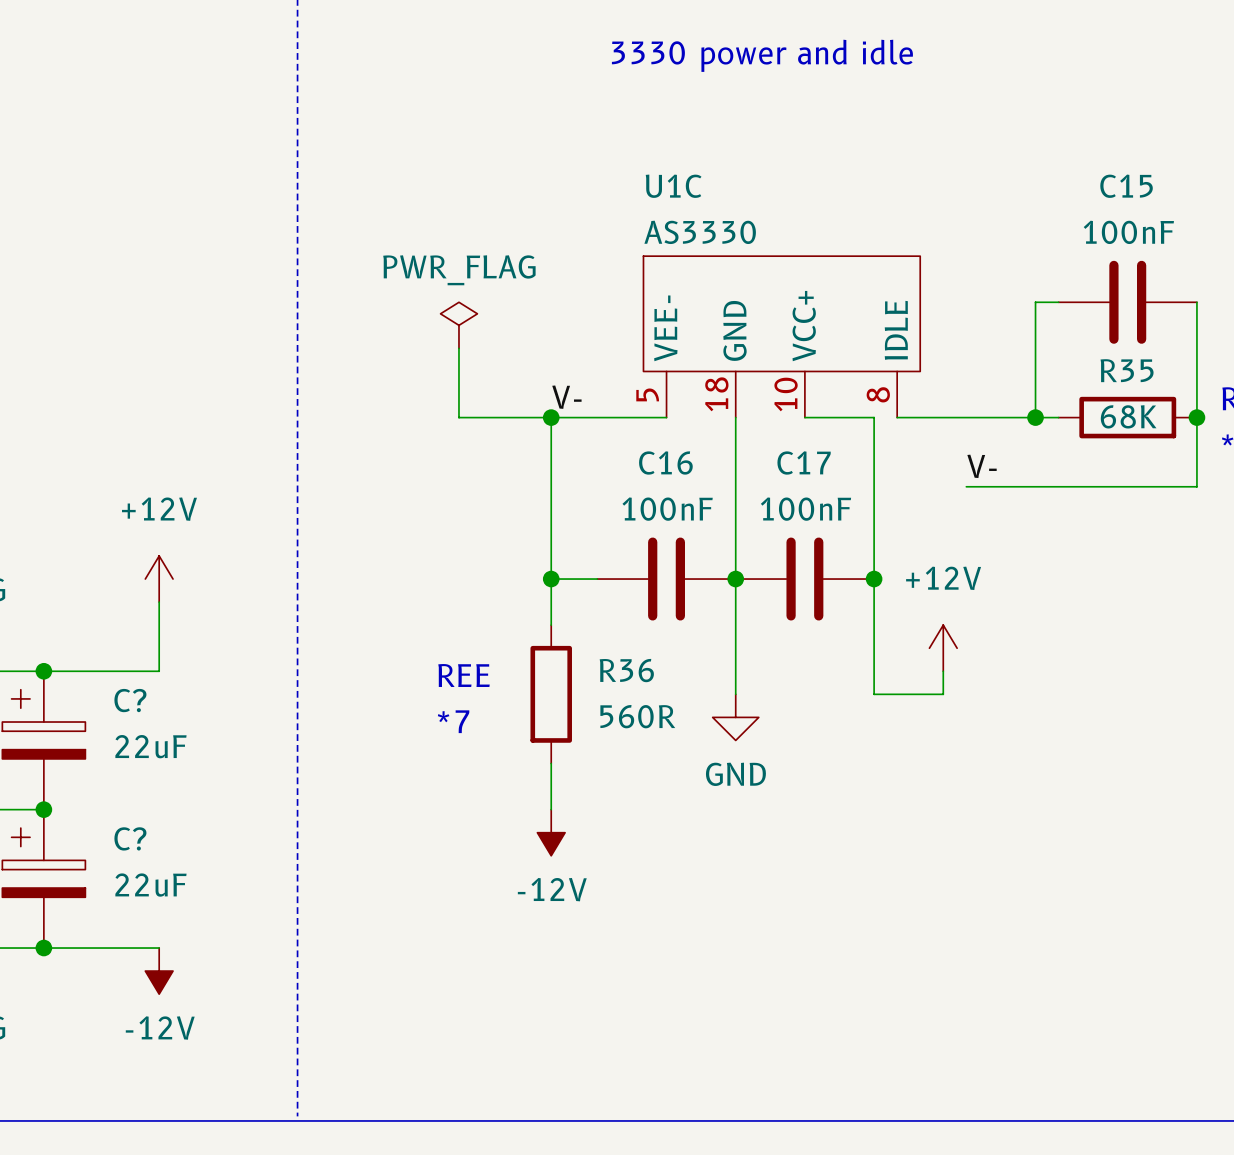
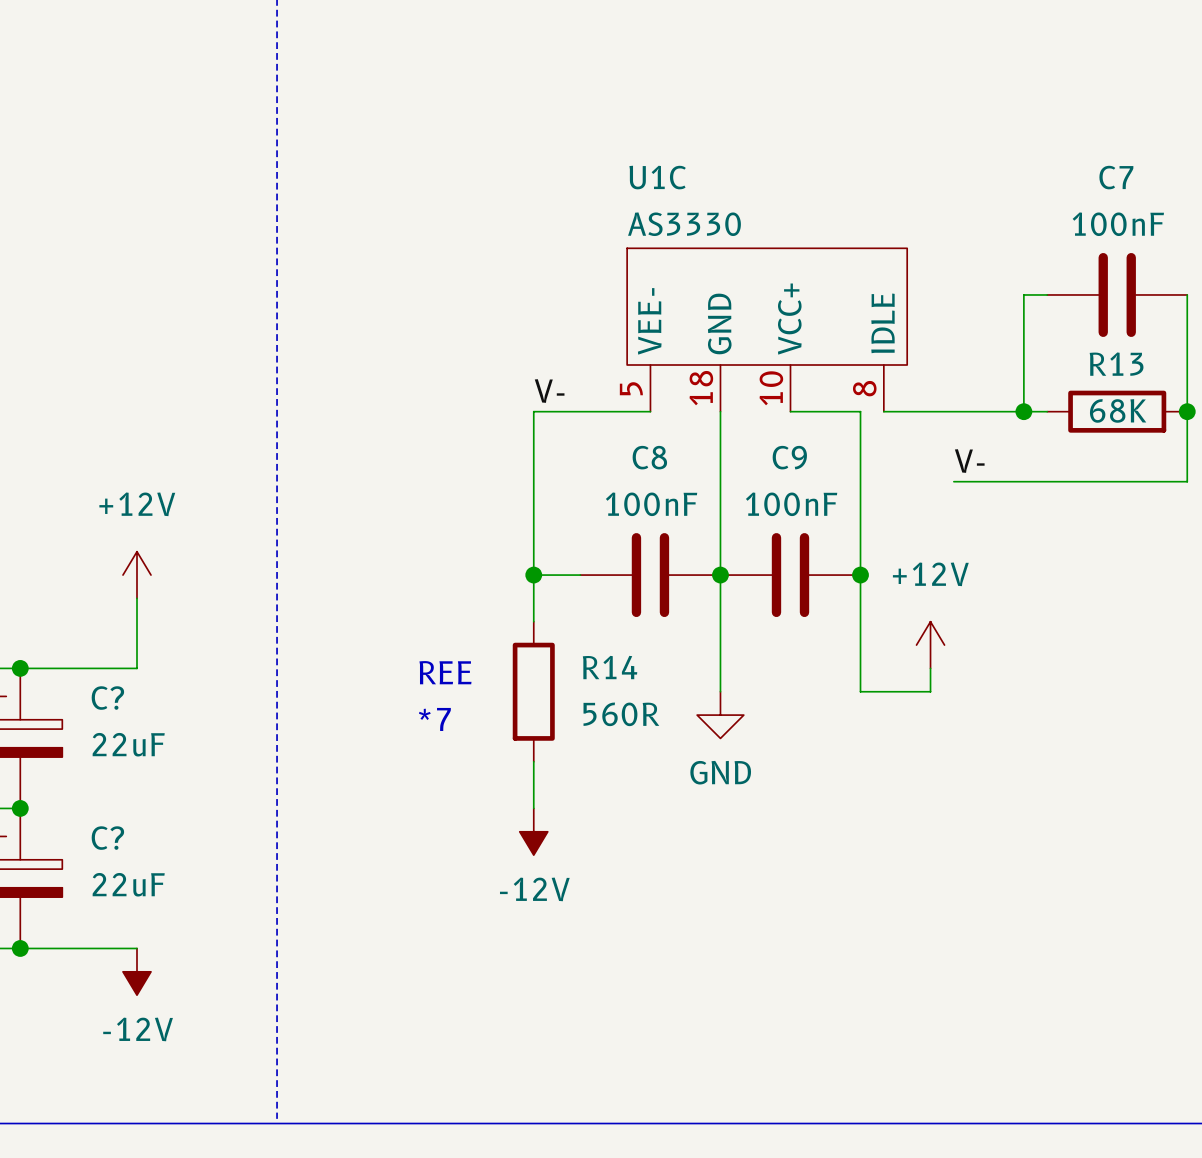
text: 3330 power and idle (762, 55) -> none
C15 name: C15 (1126, 186) -> C7 (1116, 177)
power symbol: PWR_FLAG (458, 325) -> none
wire: (458, 348) (458, 417) (551, 417) -> none
R35 name: R35 (1127, 370) -> R13 (1116, 364)
junction: (551, 417) -> none
C16 name: C16 (665, 462) -> C8 (649, 457)
C17 name: C17 (804, 462) -> C9 (789, 457)
R36 name: R36 (626, 670) -> R14 (610, 667)

